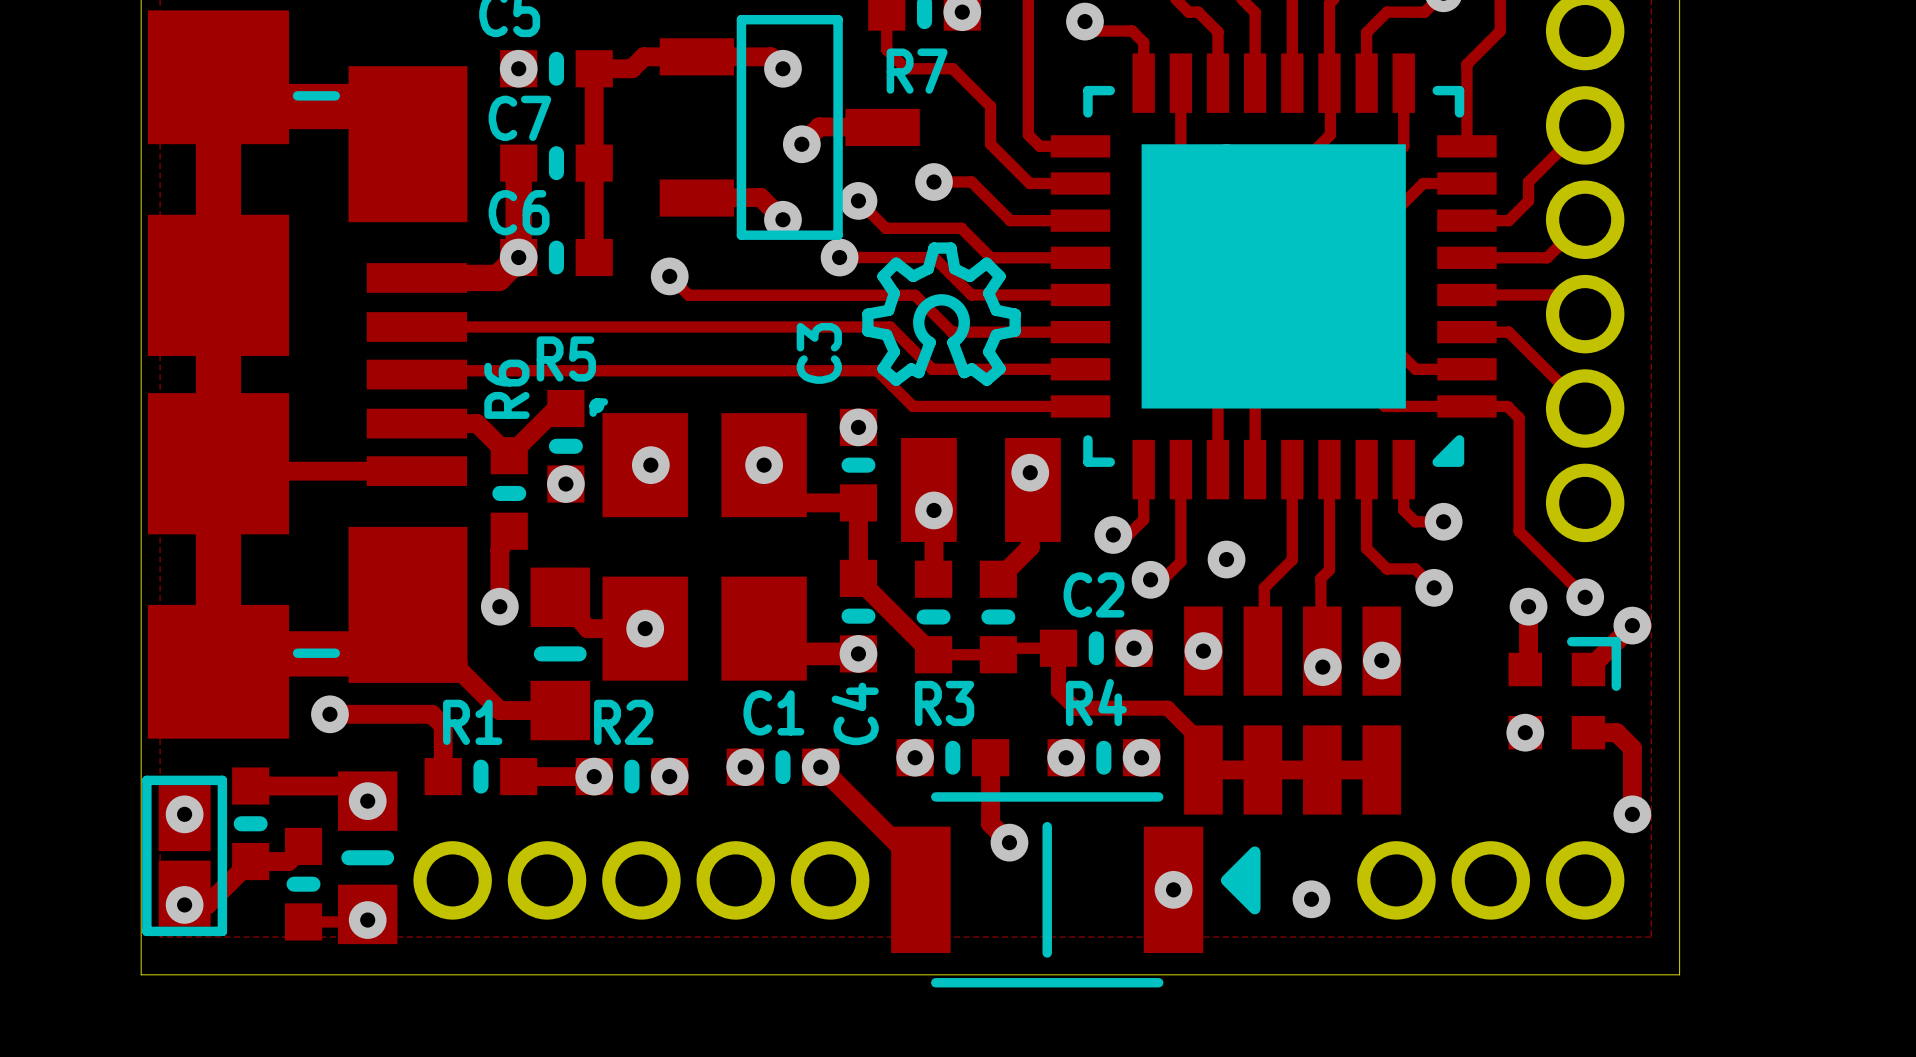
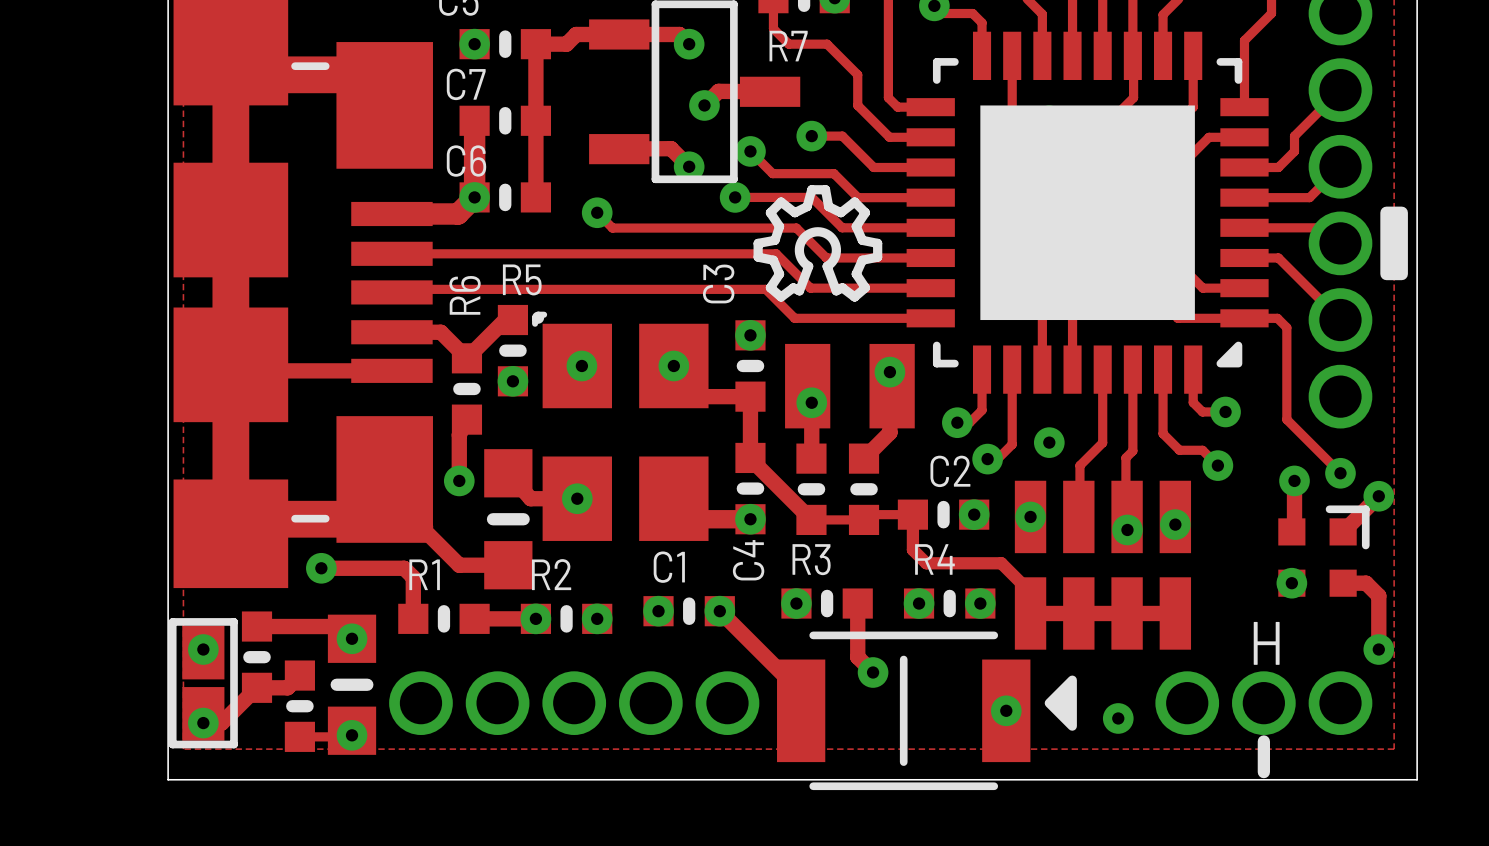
drawing: none -> [1380, 206, 1408, 281]
text: none -> H (1266, 643)
line: none -> (1263, 741) (1263, 772)

